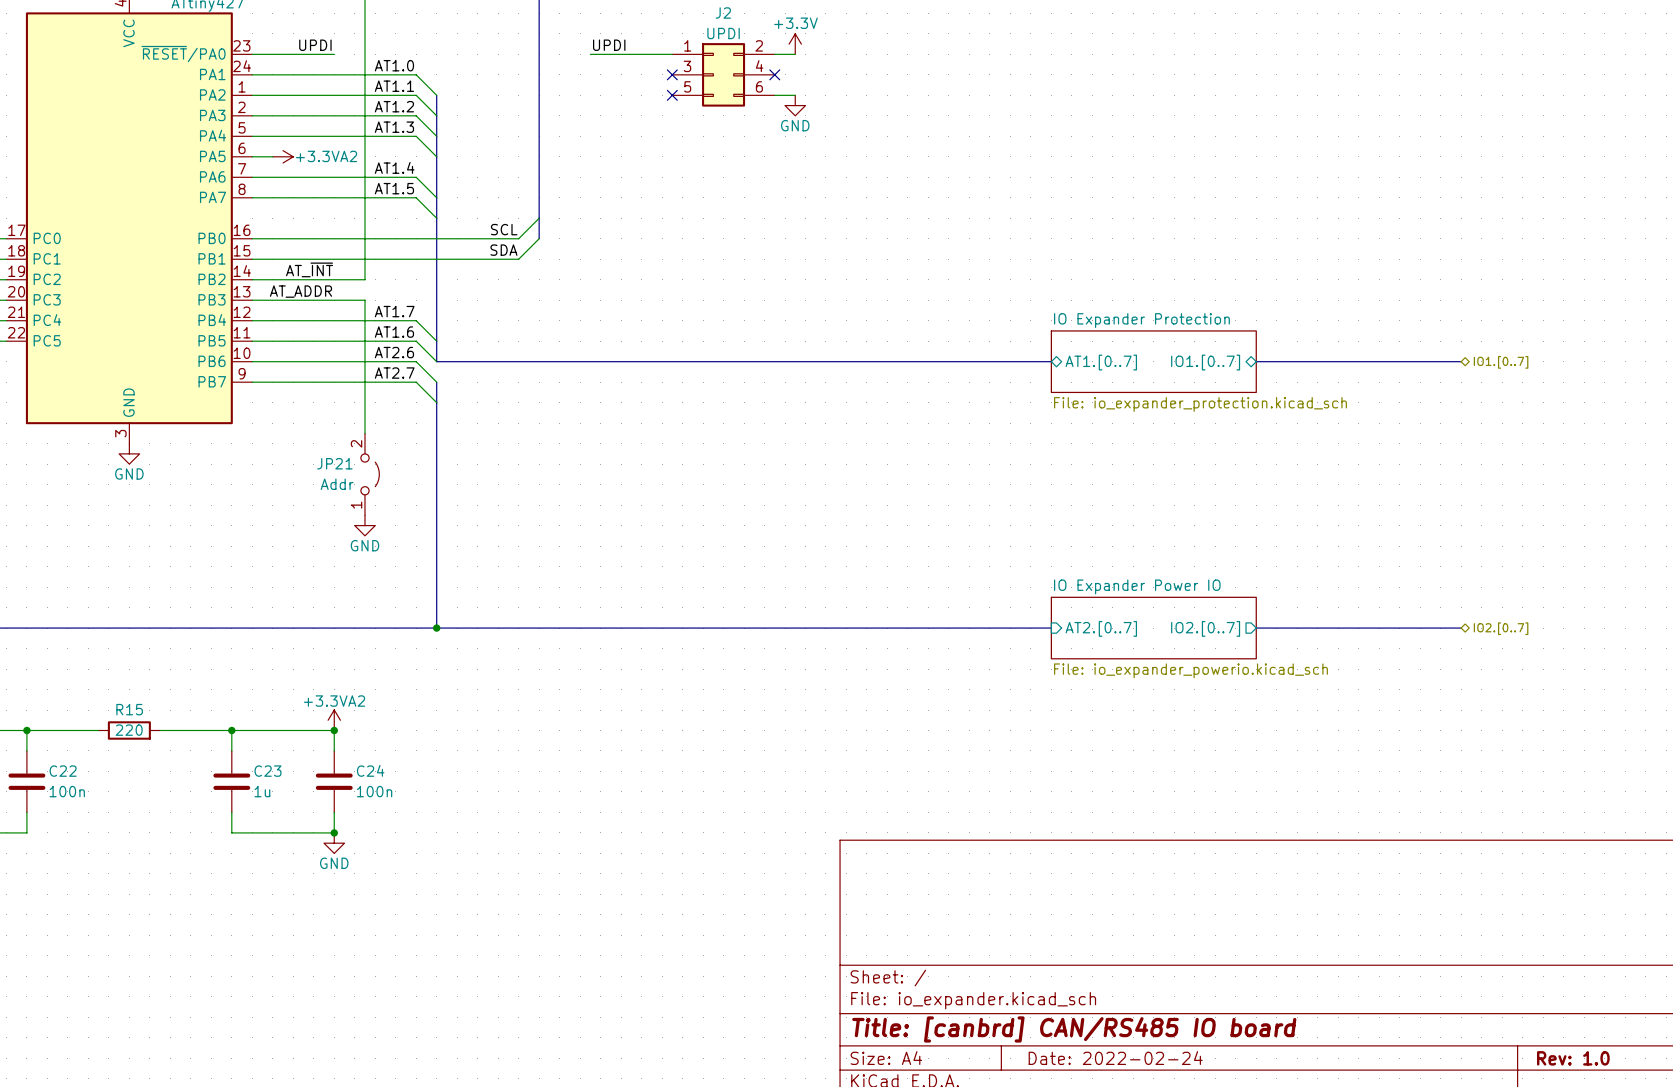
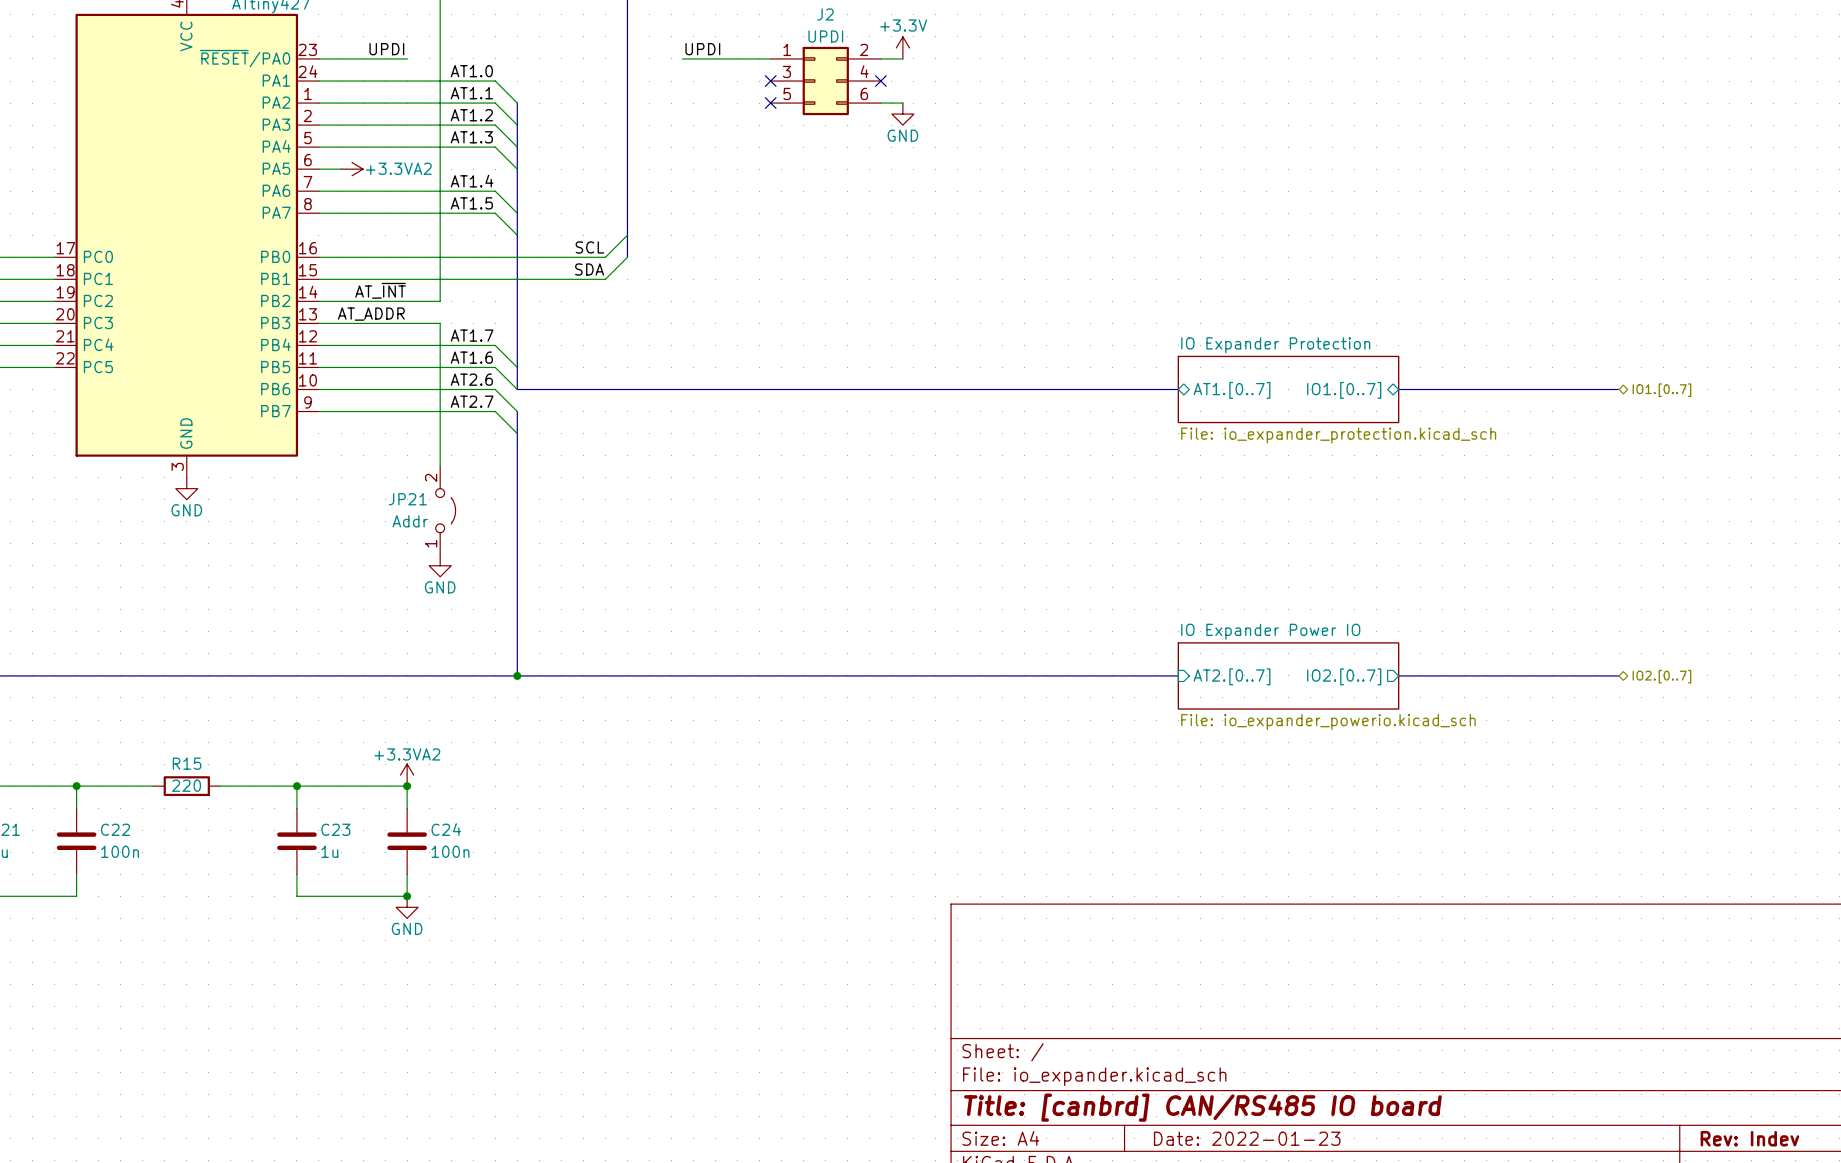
title block: Date: 2022-02-24 (1115, 1058) -> Date: 2022-01-23 (1247, 1138)
title block: Rev: 1.0 (1573, 1058) -> Rev: Indev (1749, 1138)

